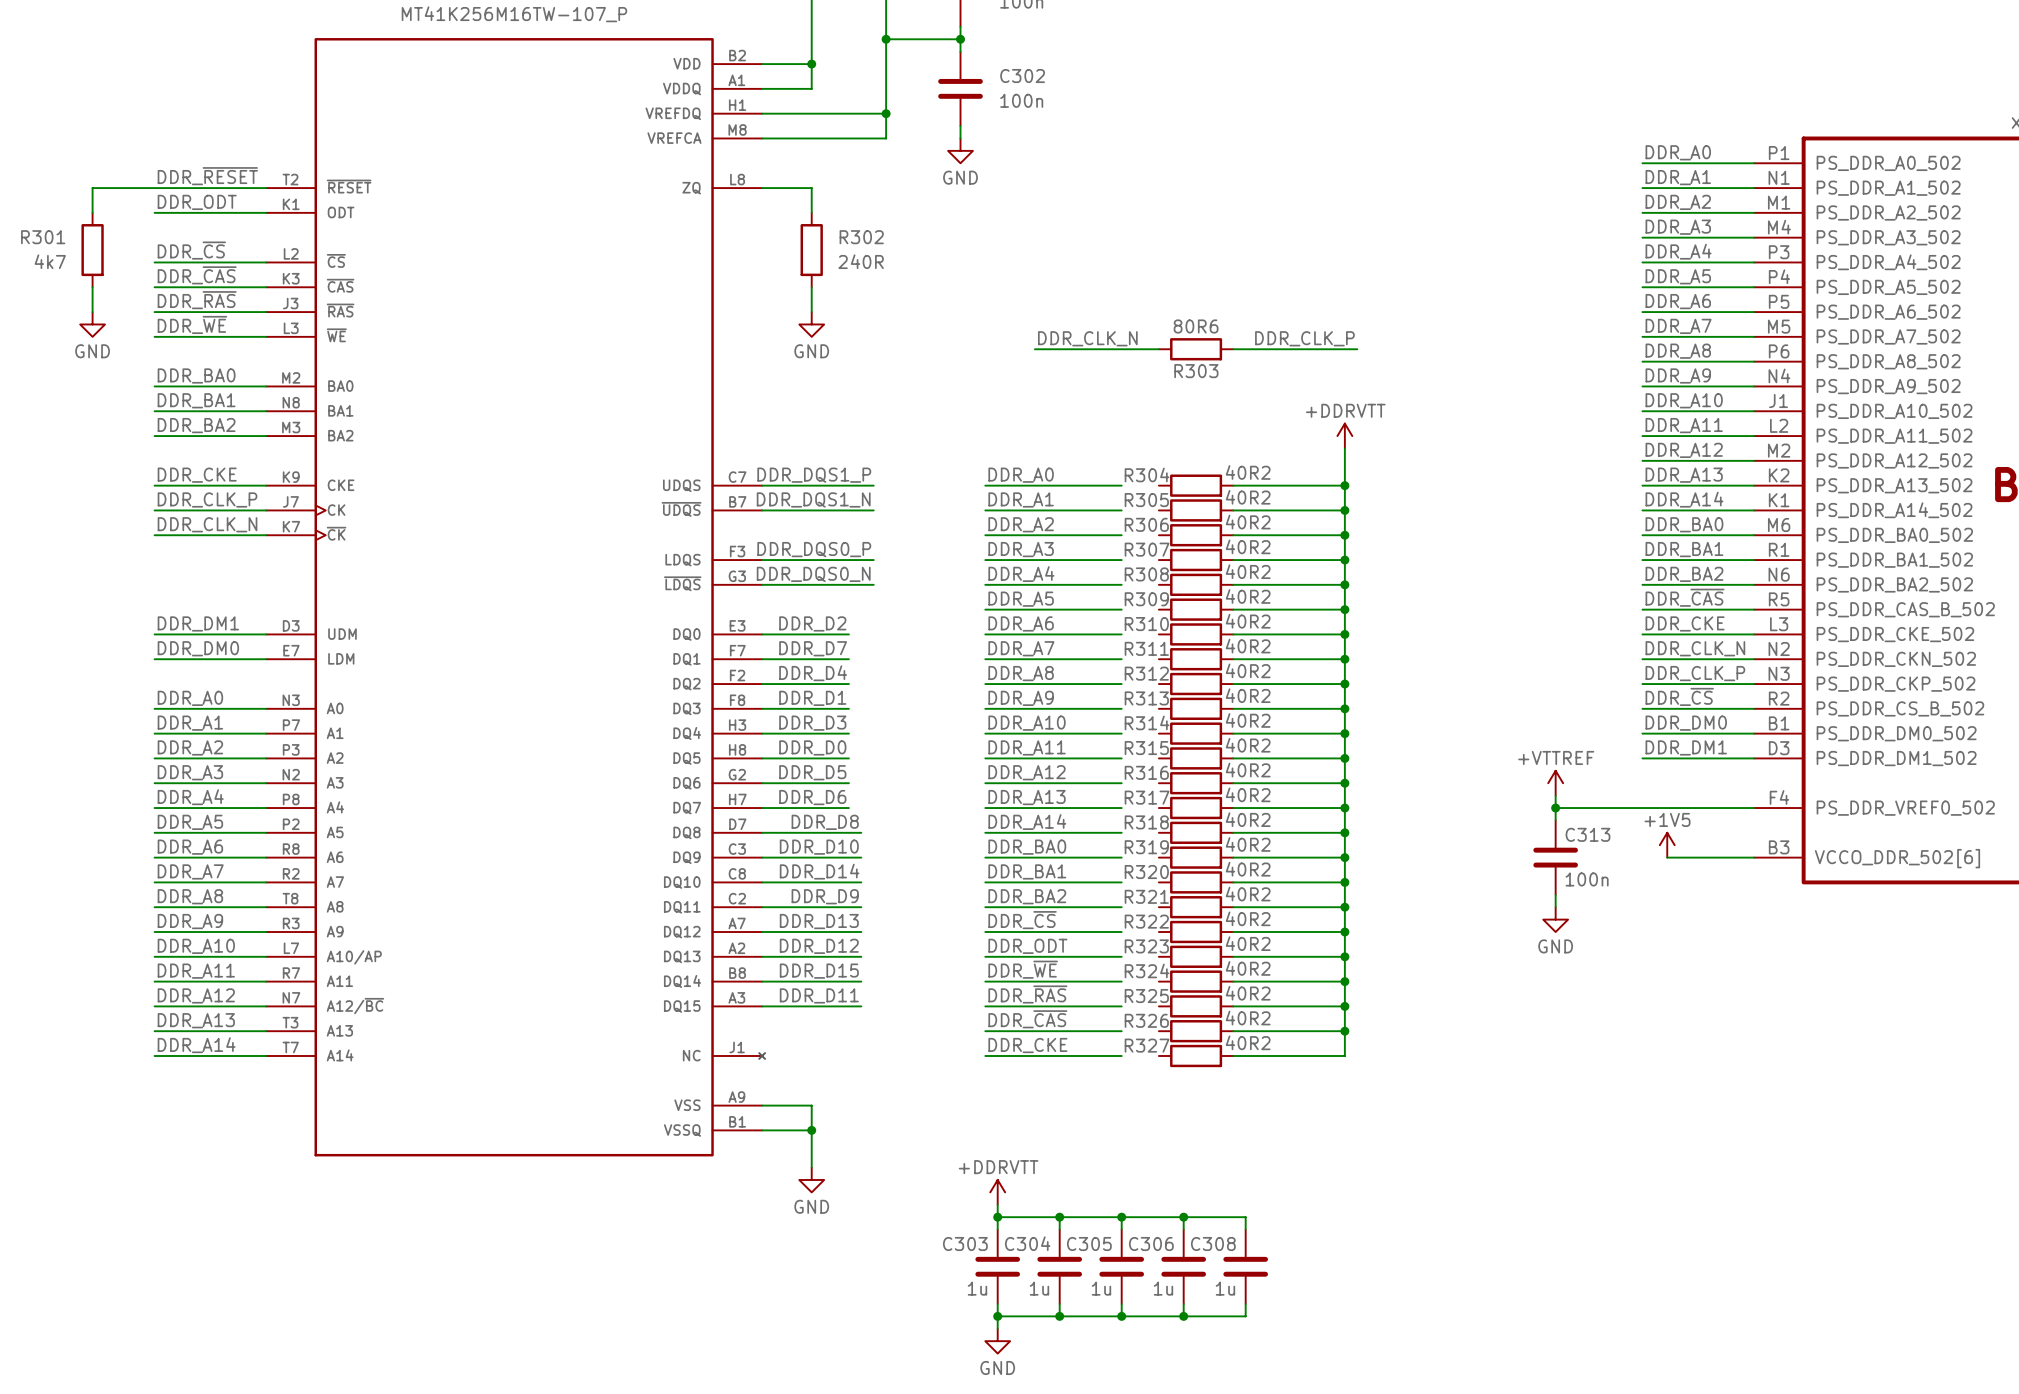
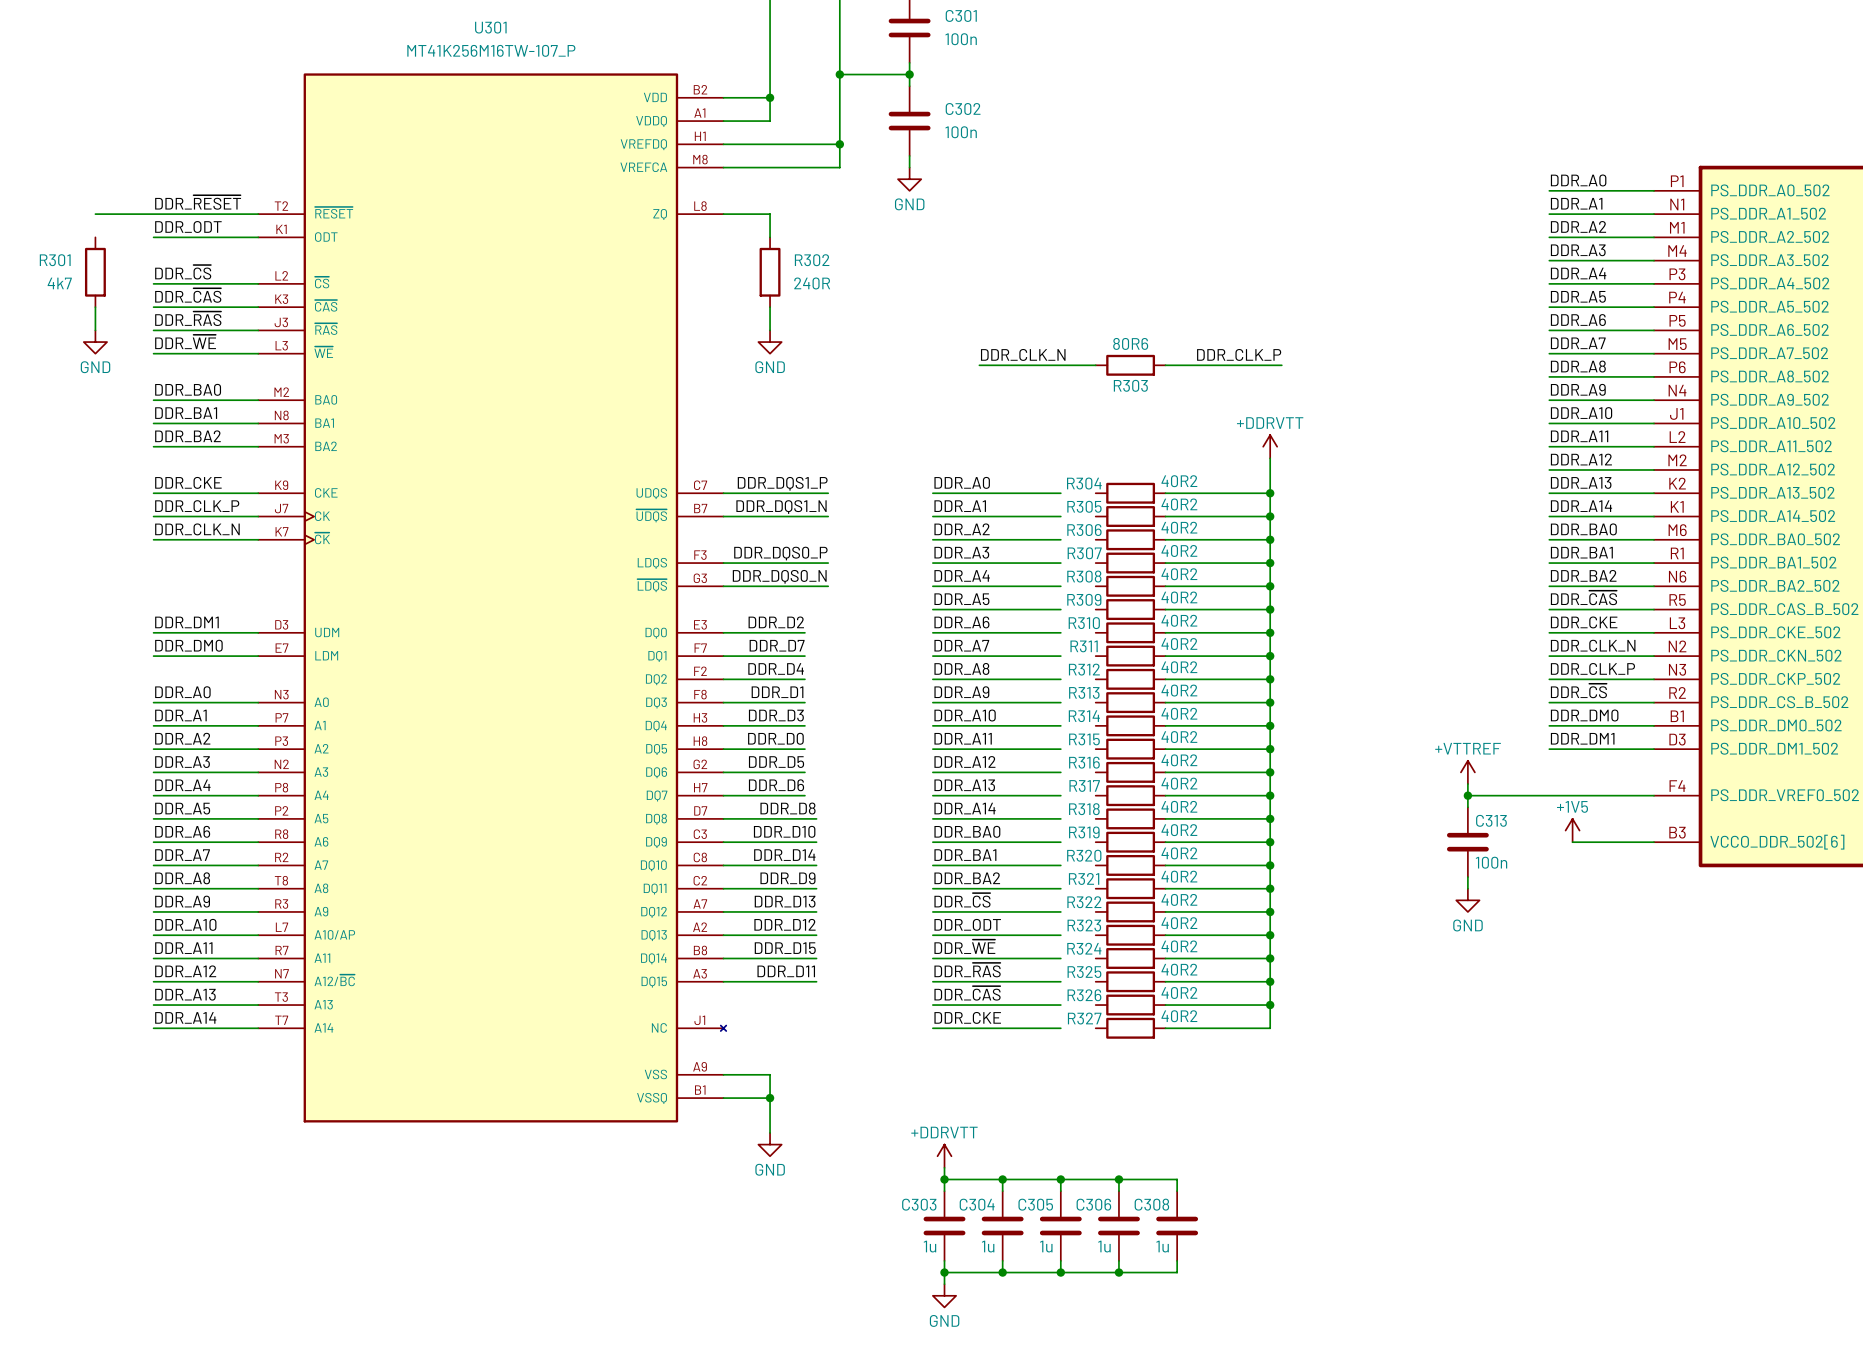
wire: (92, 188) (92, 212) -> none

